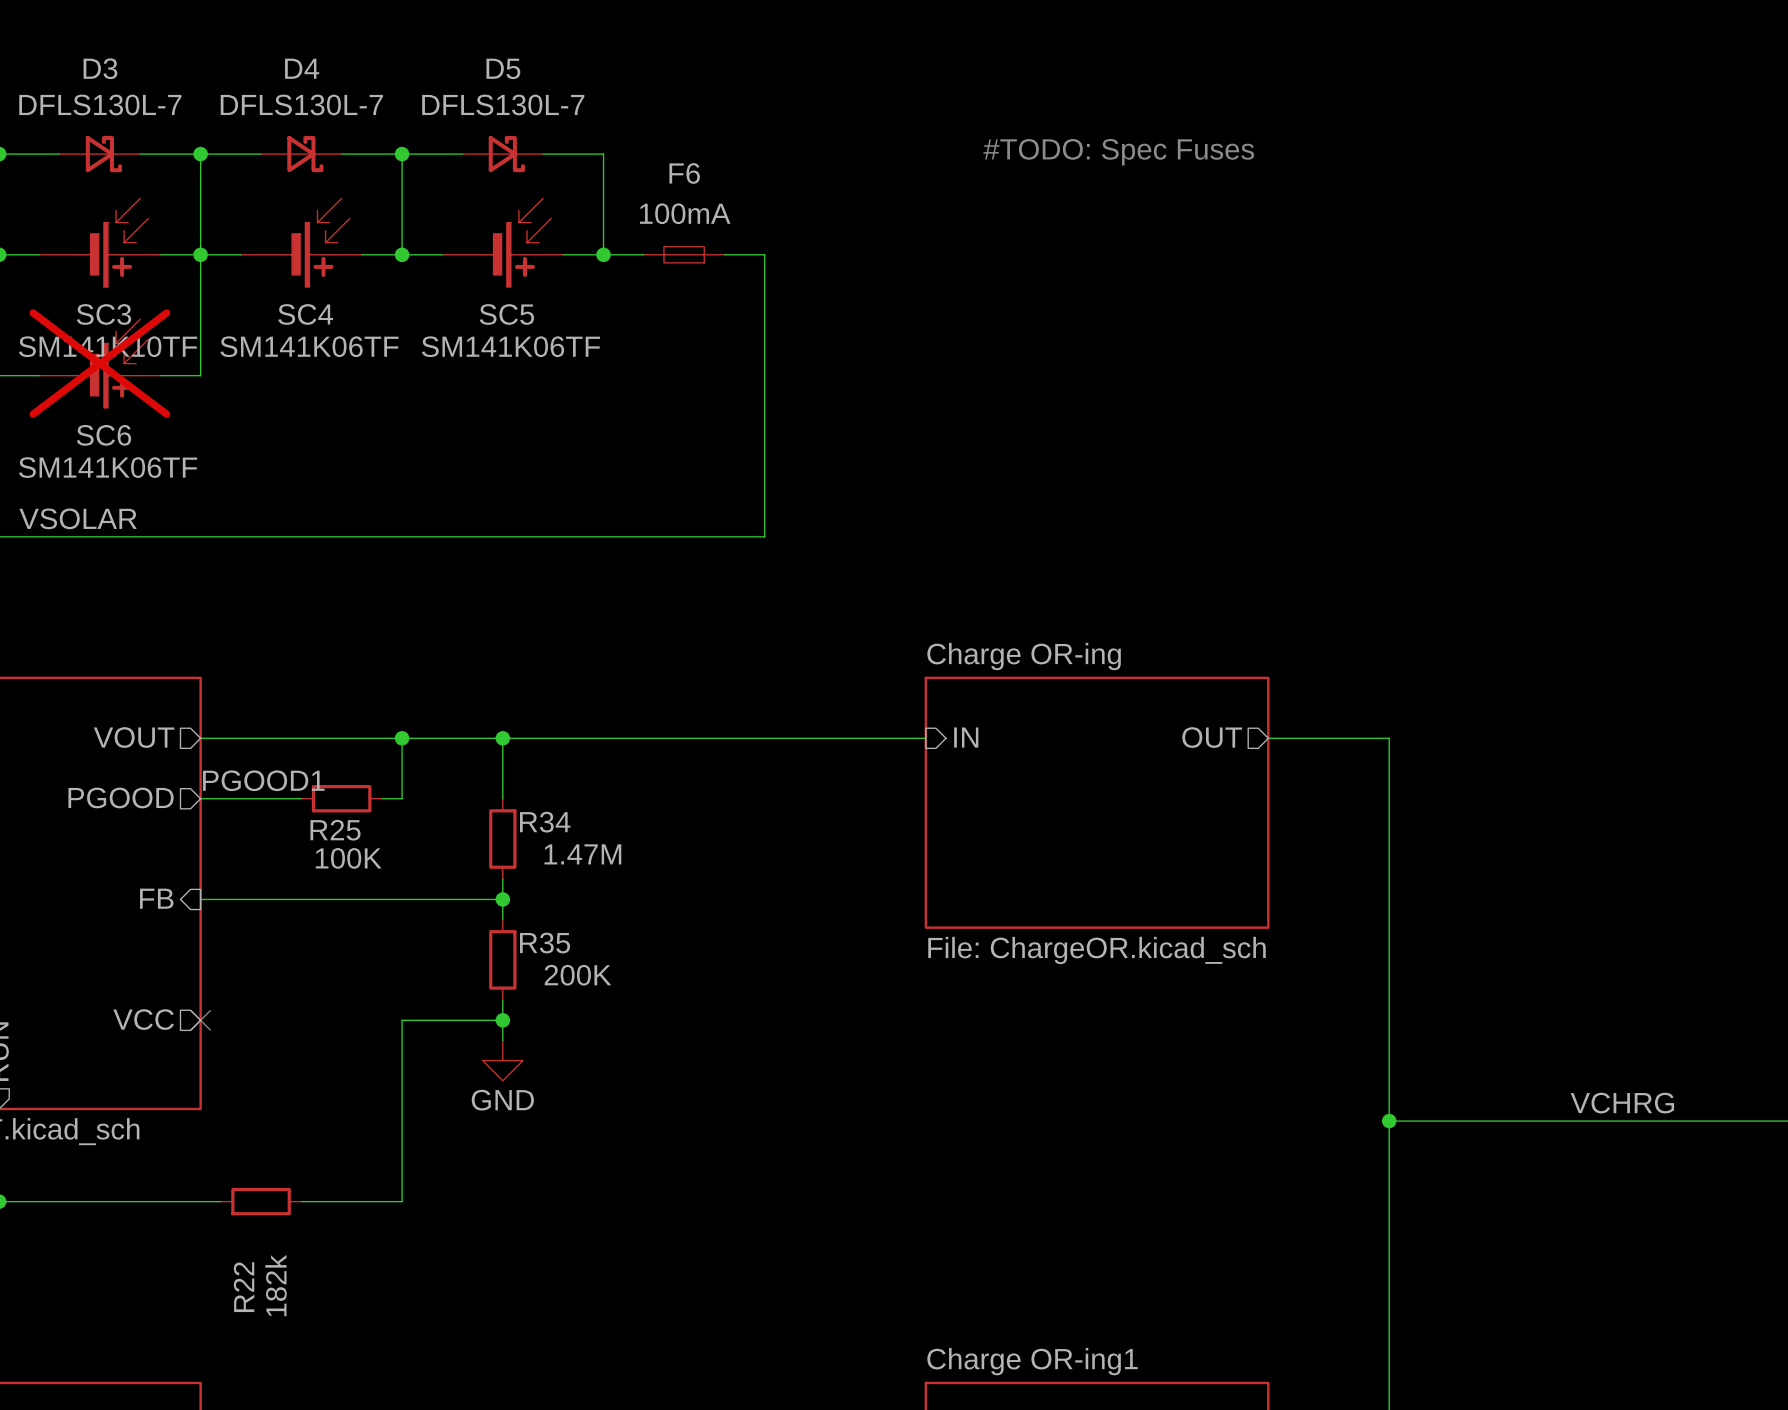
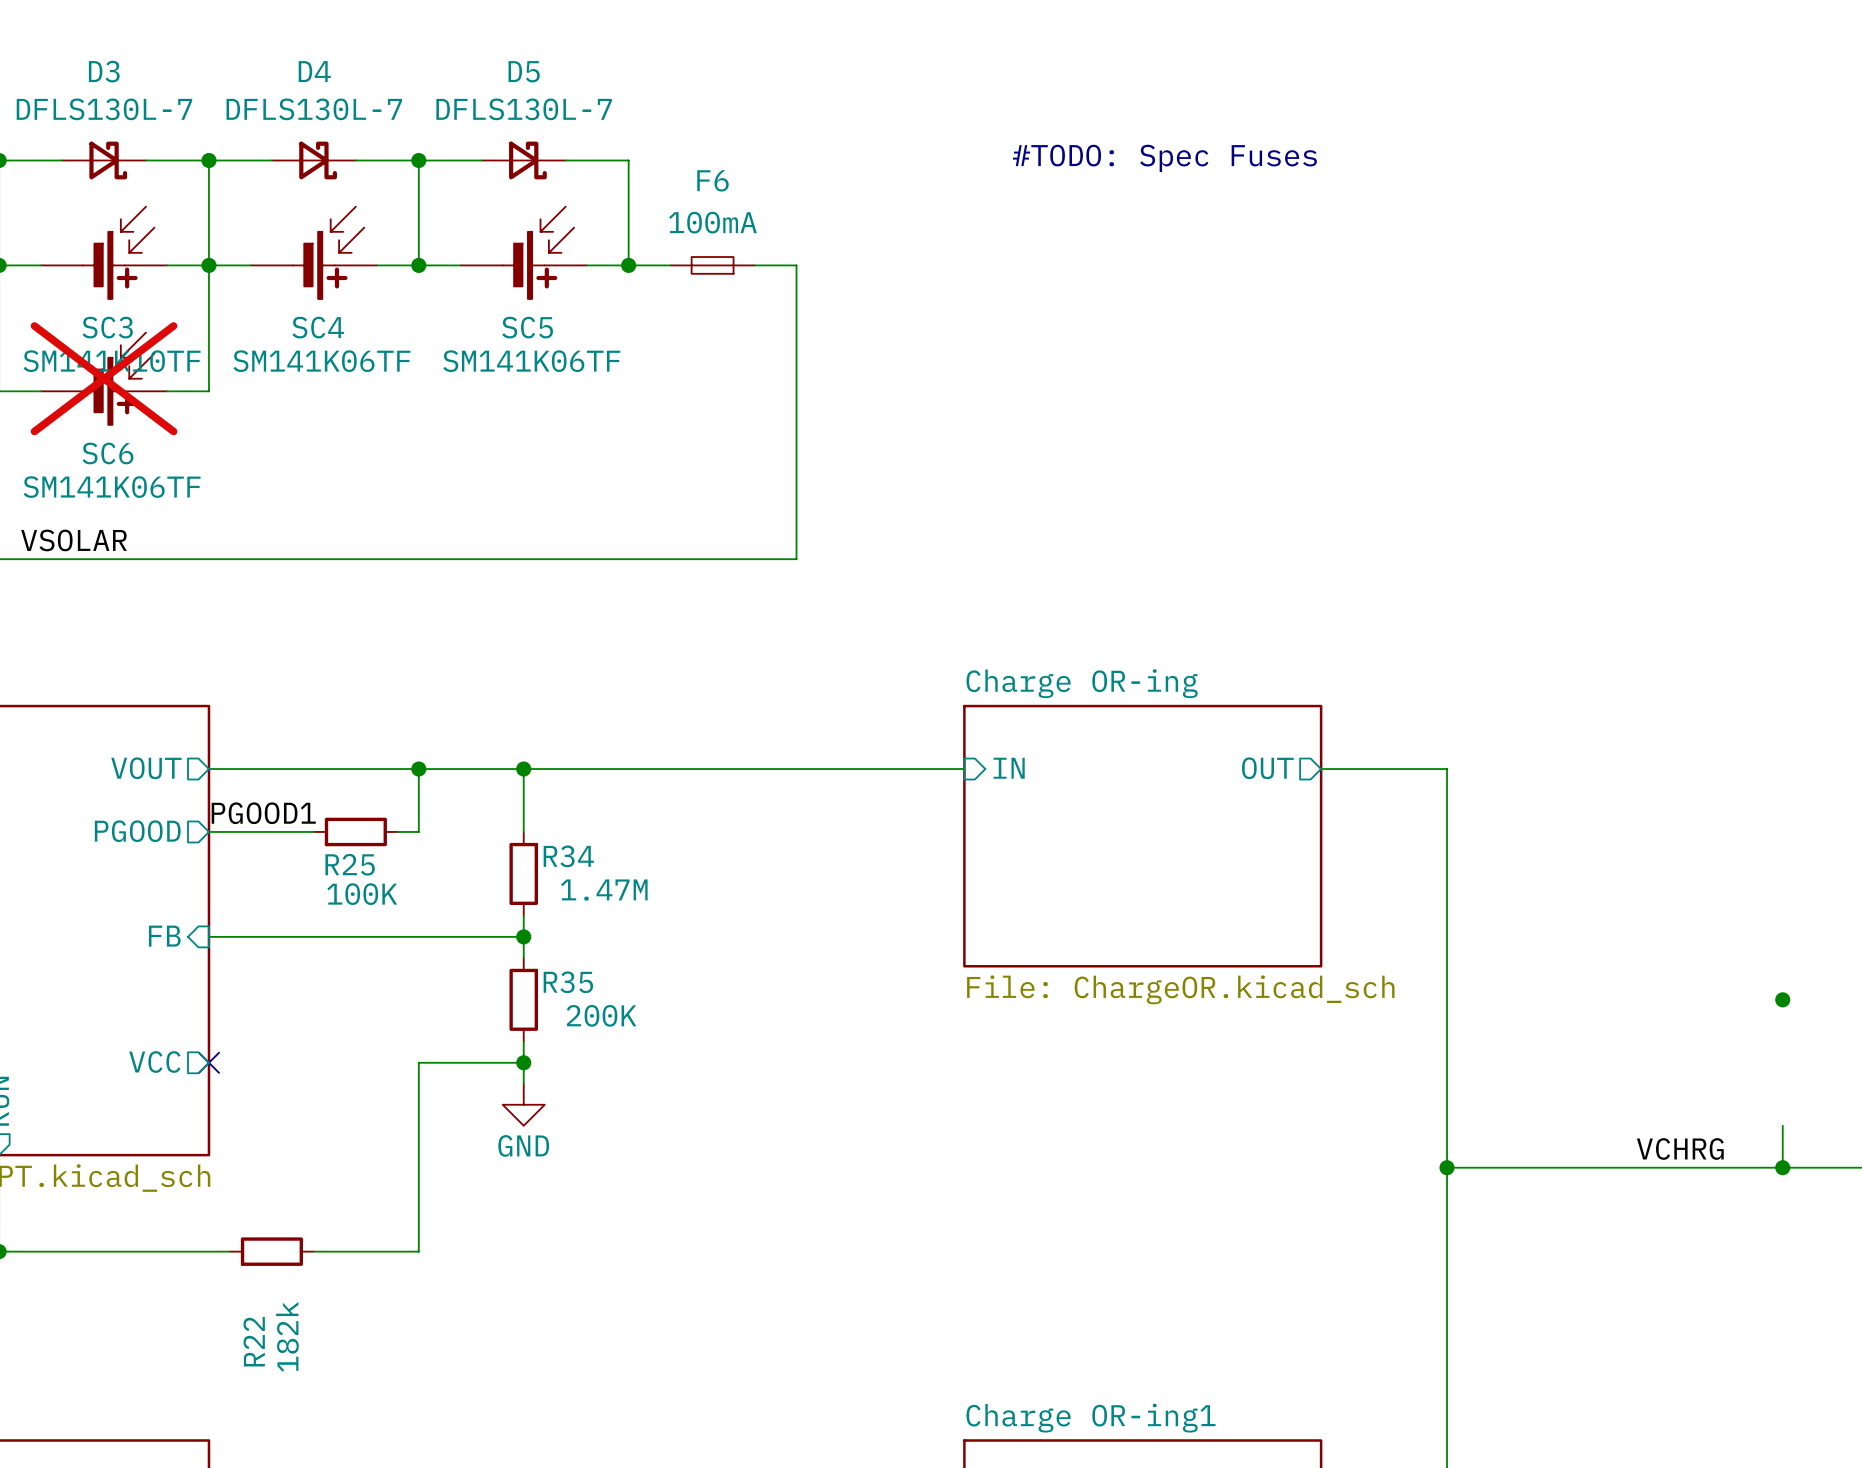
junction: none -> (1782, 999)
wire: none -> (1782, 1125) (1782, 1167)
junction: none -> (1782, 1167)

